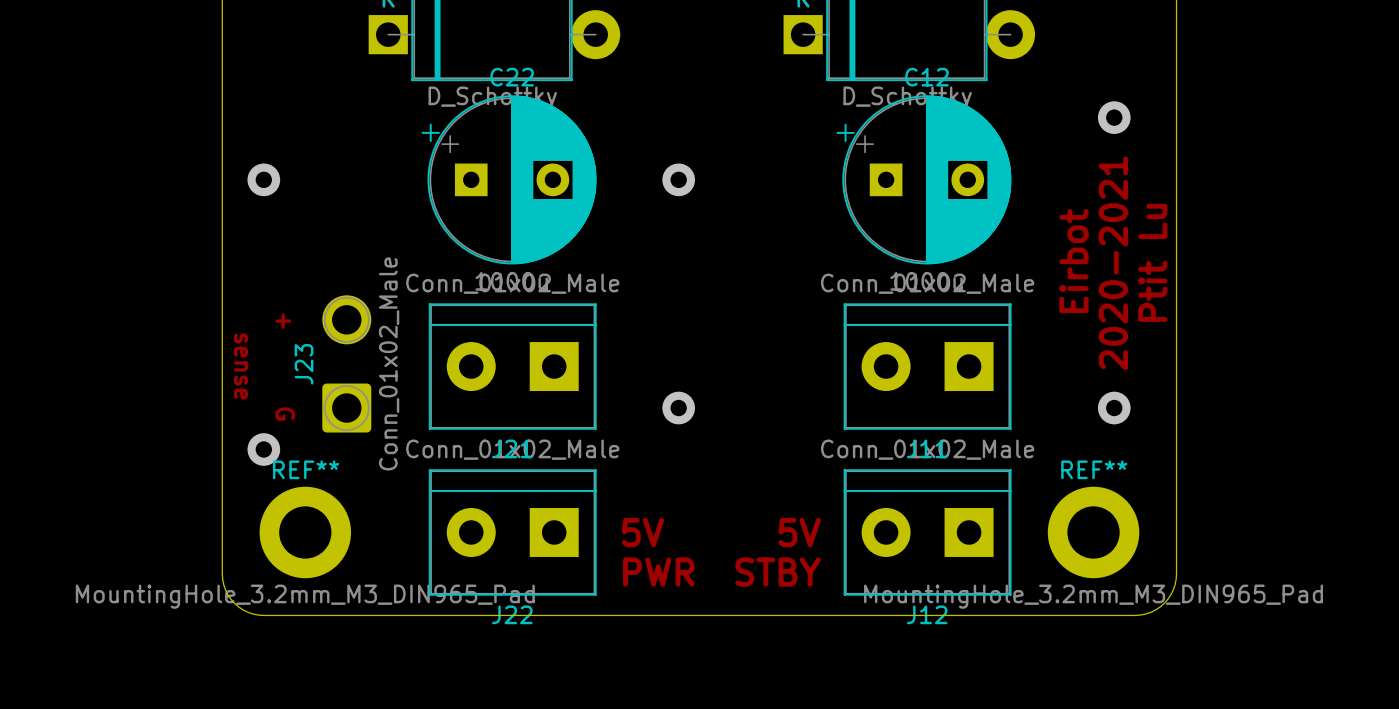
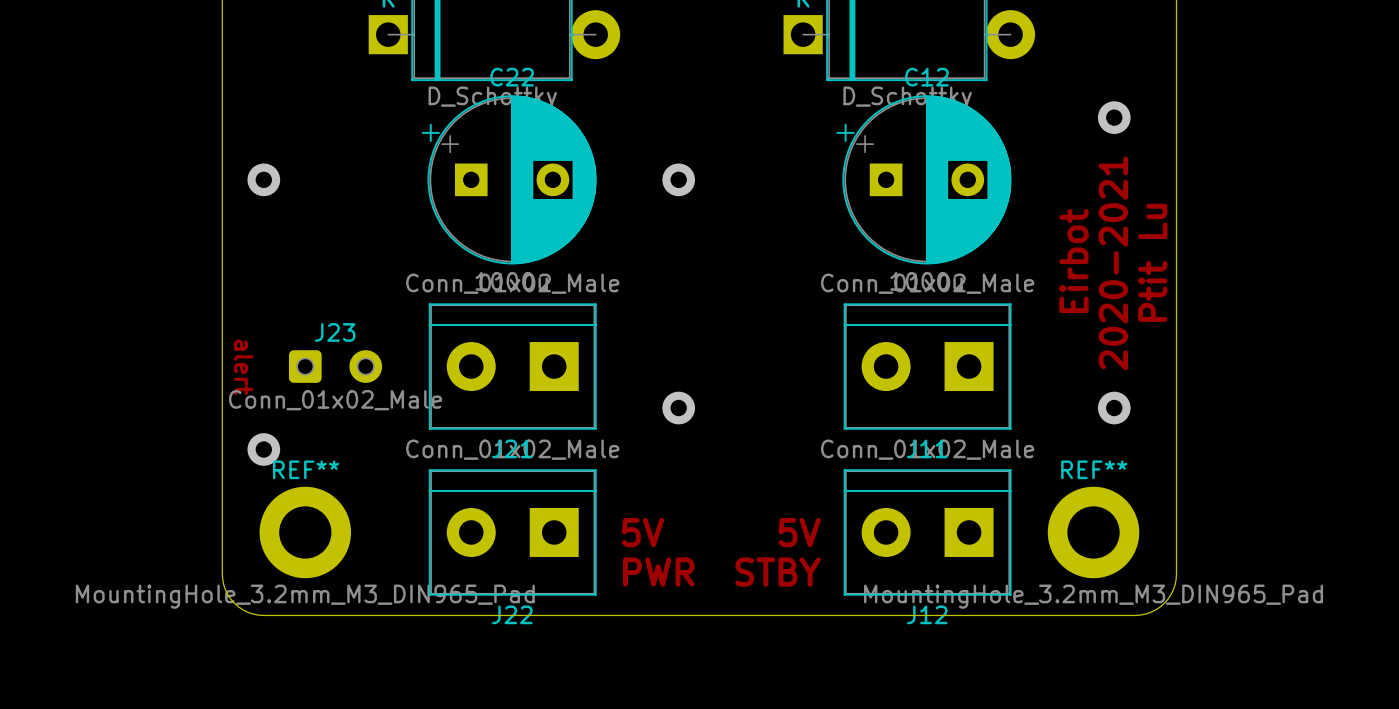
J23 footprint: [322, 295, 372, 433] -> [288, 350, 383, 383]
J23 value position: Conn_01x02_Male (389, 363) -> Conn_01x02_Male (335, 400)
J23 name position: J23 (304, 364) -> J23 (335, 332)
text: sense (240, 366) -> alert (243, 367)
text: + G (285, 366) -> none

